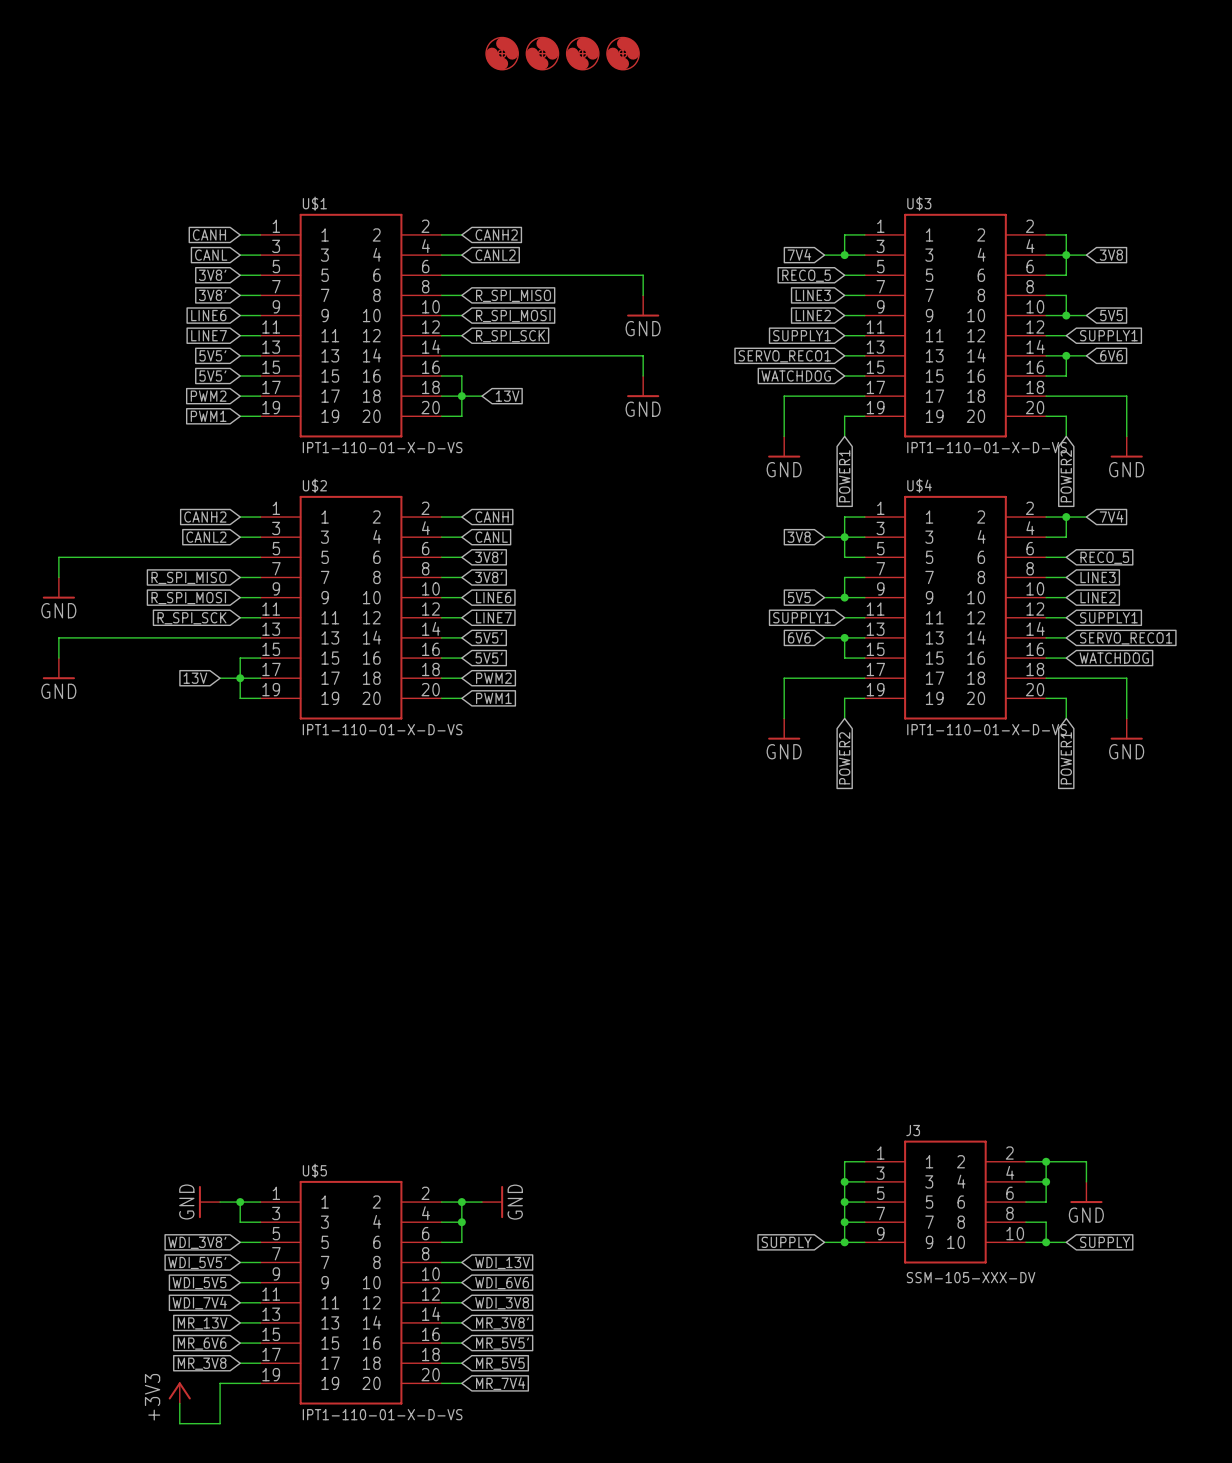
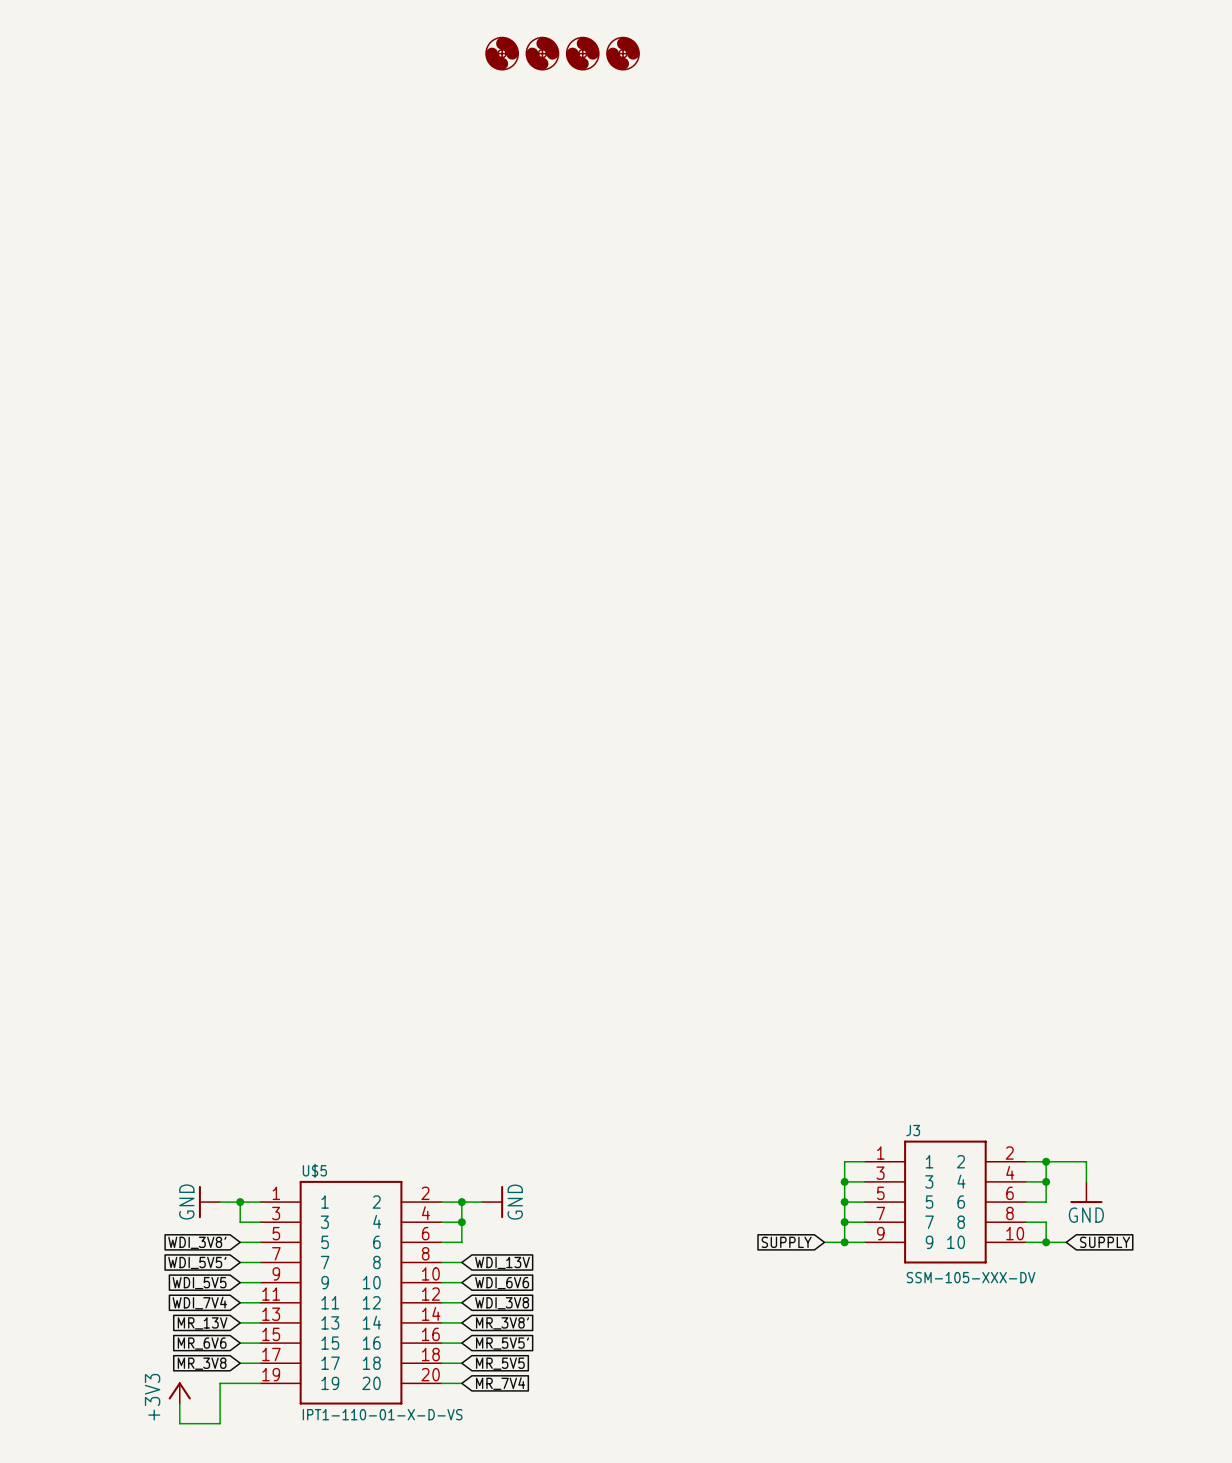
global label: CANH (209, 234) -> none
wire: (240, 234) (260, 234) -> none
wire: (441, 234) (461, 234) -> none
global label: CANH2 (496, 234) -> none
wire: (864, 234) (844, 234) (844, 255) -> none
wire: (1046, 234) (1066, 234) (1066, 275) (1046, 275) -> none
global label: 7V4 (799, 254) -> none
global label: CANL (211, 255) -> none
wire: (240, 255) (260, 255) -> none
wire: (441, 255) (461, 255) -> none
global label: CANL2 (495, 255) -> none
wire: (824, 255) (864, 255) -> none
junction: (844, 255) -> none
wire: (1046, 255) (1086, 255) -> none
junction: (1066, 255) -> none
global label: 3V8 (1111, 255) -> none
global label: 3V8' (212, 275) -> none
wire: (240, 275) (260, 275) -> none
wire: (441, 275) (643, 275) (643, 295) -> none
global label: RECO_5 (806, 275) -> none
wire: (844, 275) (864, 275) -> none
global label: 3V8' (212, 295) -> none
wire: (240, 295) (260, 295) -> none
wire: (441, 295) (461, 295) -> none
global label: R_SPI_MISO (513, 295) -> none
global label: LINE3 (813, 295) -> none
wire: (844, 295) (864, 295) -> none
wire: (1046, 295) (1066, 295) (1066, 315) -> none
power symbol: GND (643, 305) -> none
global label: LINE6 (208, 315) -> none
wire: (240, 315) (260, 315) -> none
wire: (441, 315) (461, 315) -> none
global label: LINE2 (813, 315) -> none
wire: (844, 315) (864, 315) -> none
wire: (1046, 315) (1086, 315) -> none
junction: (1066, 315) -> none
global label: 5V5 (1111, 315) -> none
global label: R_SPI_MOSI (513, 316) -> none
U$1: IPT1-110-01-X-D-VS (351, 325) -> none
U$3: IPT1-110-01-X-D-VS (955, 325) -> none
global label: LINE7 (209, 335) -> none
wire: (240, 335) (260, 335) -> none
wire: (441, 335) (461, 335) -> none
global label: SUPPLY1 (802, 335) -> none
wire: (844, 335) (864, 335) -> none
wire: (1046, 335) (1066, 335) -> none
global label: SUPPLY1 (1108, 335) -> none
global label: R_SPI_SCK (510, 336) -> none
global label: 5V5' (212, 355) -> none
wire: (240, 355) (260, 355) -> none
wire: (441, 355) (643, 355) (643, 375) -> none
wire: (844, 355) (864, 355) -> none
wire: (1046, 355) (1086, 355) -> none
wire: (1066, 355) (1066, 375) (1046, 375) -> none
junction: (1066, 355) -> none
global label: 6V6 (1111, 355) -> none
global label: SERVO_RECO1 (784, 356) -> none
global label: 5V5' (212, 375) -> none
wire: (240, 375) (260, 375) -> none
wire: (441, 375) (461, 375) (461, 416) (441, 416) -> none
global label: WATCHDOG (796, 375) -> none
wire: (844, 375) (864, 375) -> none
power symbol: GND (643, 386) -> none
global label: PWM2 (208, 396) -> none
wire: (240, 396) (260, 396) -> none
wire: (441, 396) (481, 396) -> none
junction: (461, 396) -> none
global label: 13V (507, 396) -> none
wire: (864, 396) (784, 396) (784, 436) -> none
wire: (1046, 396) (1126, 396) (1126, 436) -> none
global label: PWM1 (208, 416) -> none
wire: (240, 416) (260, 416) -> none
wire: (864, 416) (844, 416) (844, 436) -> none
wire: (1046, 416) (1066, 416) (1066, 436) -> none
power symbol: GND (784, 447) -> none
power symbol: GND (1126, 447) -> none
global label: POWER1 (844, 476) -> none
global label: POWER2 (1066, 476) -> none
global label: 7V4 (1111, 516) -> none
global label: CANH2 (205, 517) -> none
wire: (240, 517) (260, 517) -> none
wire: (441, 517) (461, 517) -> none
global label: CANH (492, 517) -> none
wire: (864, 517) (844, 517) (844, 557) (864, 557) -> none
wire: (1046, 517) (1086, 517) -> none
wire: (1066, 517) (1066, 537) (1046, 537) -> none
junction: (1066, 517) -> none
global label: CANL2 (206, 537) -> none
wire: (240, 537) (260, 537) -> none
wire: (441, 537) (461, 537) -> none
global label: CANL (491, 537) -> none
global label: 3V8 (799, 537) -> none
wire: (824, 537) (864, 537) -> none
junction: (844, 537) -> none
wire: (260, 557) (58, 557) (58, 577) -> none
wire: (441, 557) (461, 557) -> none
global label: 3V8' (488, 557) -> none
wire: (1046, 557) (1066, 557) -> none
global label: RECO_5 (1104, 557) -> none
global label: R_SPI_MISO (188, 577) -> none
wire: (240, 577) (260, 577) -> none
wire: (441, 577) (461, 577) -> none
global label: 3V8' (488, 577) -> none
wire: (864, 577) (844, 577) (844, 597) -> none
wire: (1046, 577) (1066, 577) -> none
global label: LINE3 (1098, 577) -> none
power symbol: GND (58, 588) -> none
wire: (240, 597) (260, 597) -> none
wire: (441, 597) (461, 597) -> none
global label: LINE6 (493, 597) -> none
global label: 5V5 (799, 597) -> none
wire: (824, 597) (864, 597) -> none
junction: (844, 597) -> none
wire: (1046, 597) (1066, 597) -> none
global label: LINE2 (1098, 597) -> none
global label: R_SPI_MOSI (188, 598) -> none
U$2: IPT1-110-01-X-D-VS (351, 607) -> none
U$4: IPT1-110-01-X-D-VS (955, 607) -> none
wire: (240, 617) (260, 617) -> none
wire: (441, 617) (461, 617) -> none
global label: LINE7 (493, 617) -> none
global label: SUPPLY1 (802, 617) -> none
wire: (844, 617) (864, 617) -> none
wire: (1046, 617) (1066, 617) -> none
global label: SUPPLY1 (1108, 617) -> none
global label: R_SPI_SCK (191, 618) -> none
wire: (260, 637) (58, 637) (58, 658) -> none
wire: (441, 637) (461, 637) -> none
global label: 5V5' (489, 637) -> none
global label: 6V6 (799, 637) -> none
wire: (824, 637) (864, 637) -> none
wire: (844, 637) (844, 658) (864, 658) -> none
junction: (844, 637) -> none
wire: (1046, 637) (1066, 637) -> none
global label: SERVO_RECO1 (1126, 638) -> none
wire: (260, 658) (240, 658) (240, 698) (260, 698) -> none
wire: (441, 658) (461, 658) -> none
global label: 5V5' (489, 658) -> none
wire: (1046, 658) (1066, 658) -> none
global label: WATCHDOG (1114, 658) -> none
power symbol: GND (58, 668) -> none
global label: 13V (195, 678) -> none
wire: (220, 678) (260, 678) -> none
junction: (240, 678) -> none
wire: (441, 678) (461, 678) -> none
global label: PWM2 (493, 678) -> none
wire: (864, 678) (784, 678) (784, 718) -> none
wire: (1046, 678) (1126, 678) (1126, 718) -> none
wire: (441, 698) (461, 698) -> none
global label: PWM1 (493, 698) -> none
wire: (864, 698) (844, 698) (844, 718) -> none
wire: (1046, 698) (1066, 698) (1066, 718) -> none
power symbol: GND (784, 729) -> none
power symbol: GND (1126, 729) -> none
global label: POWER2 (844, 758) -> none
global label: POWER1 (1066, 758) -> none

